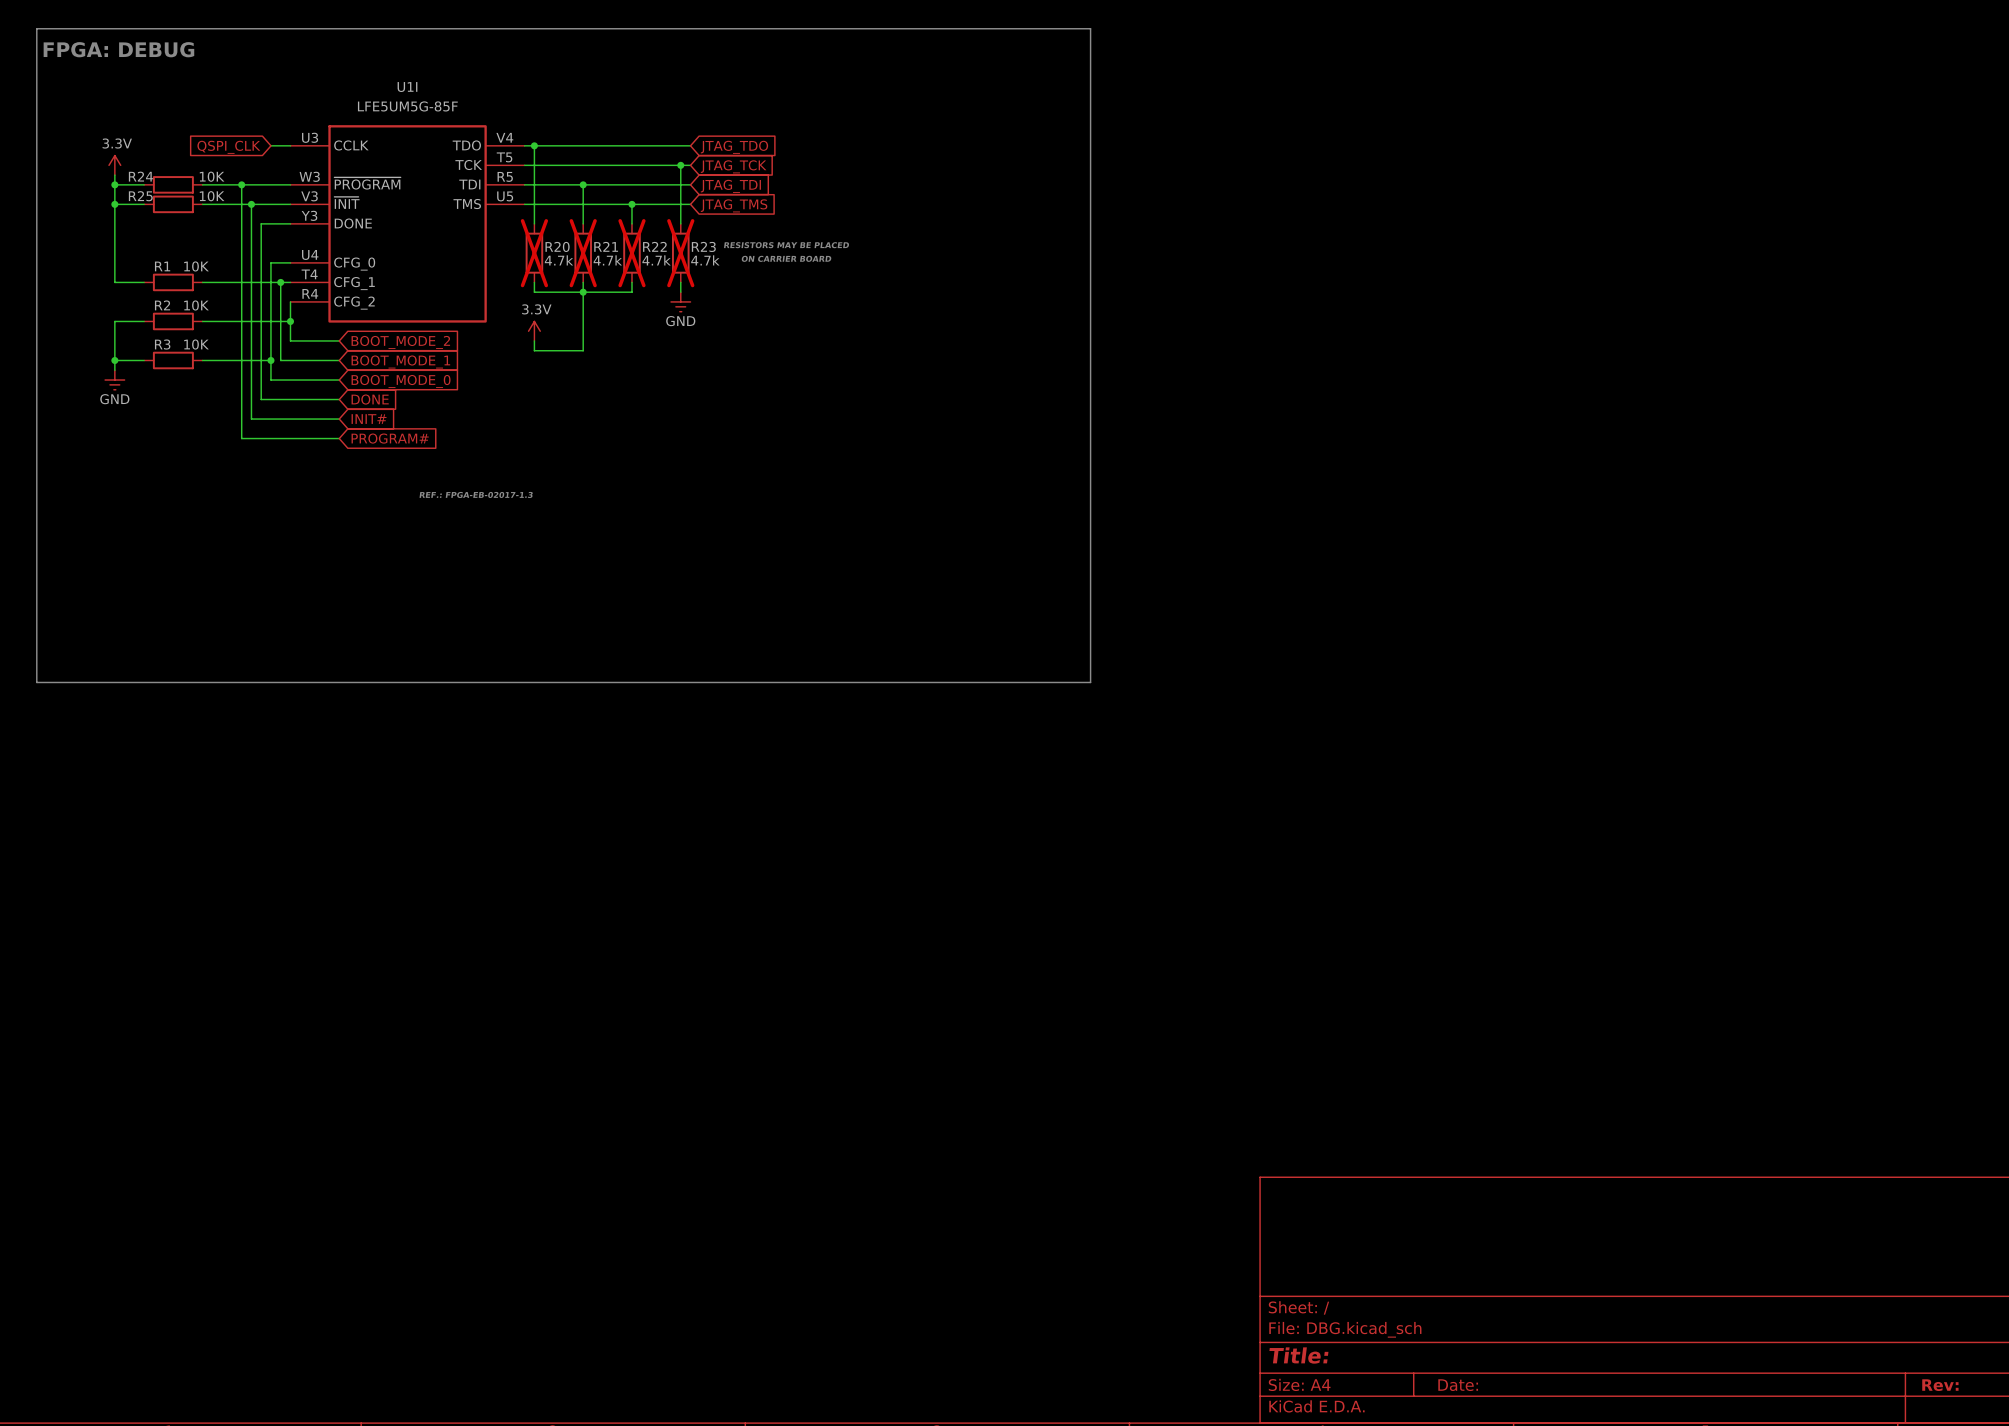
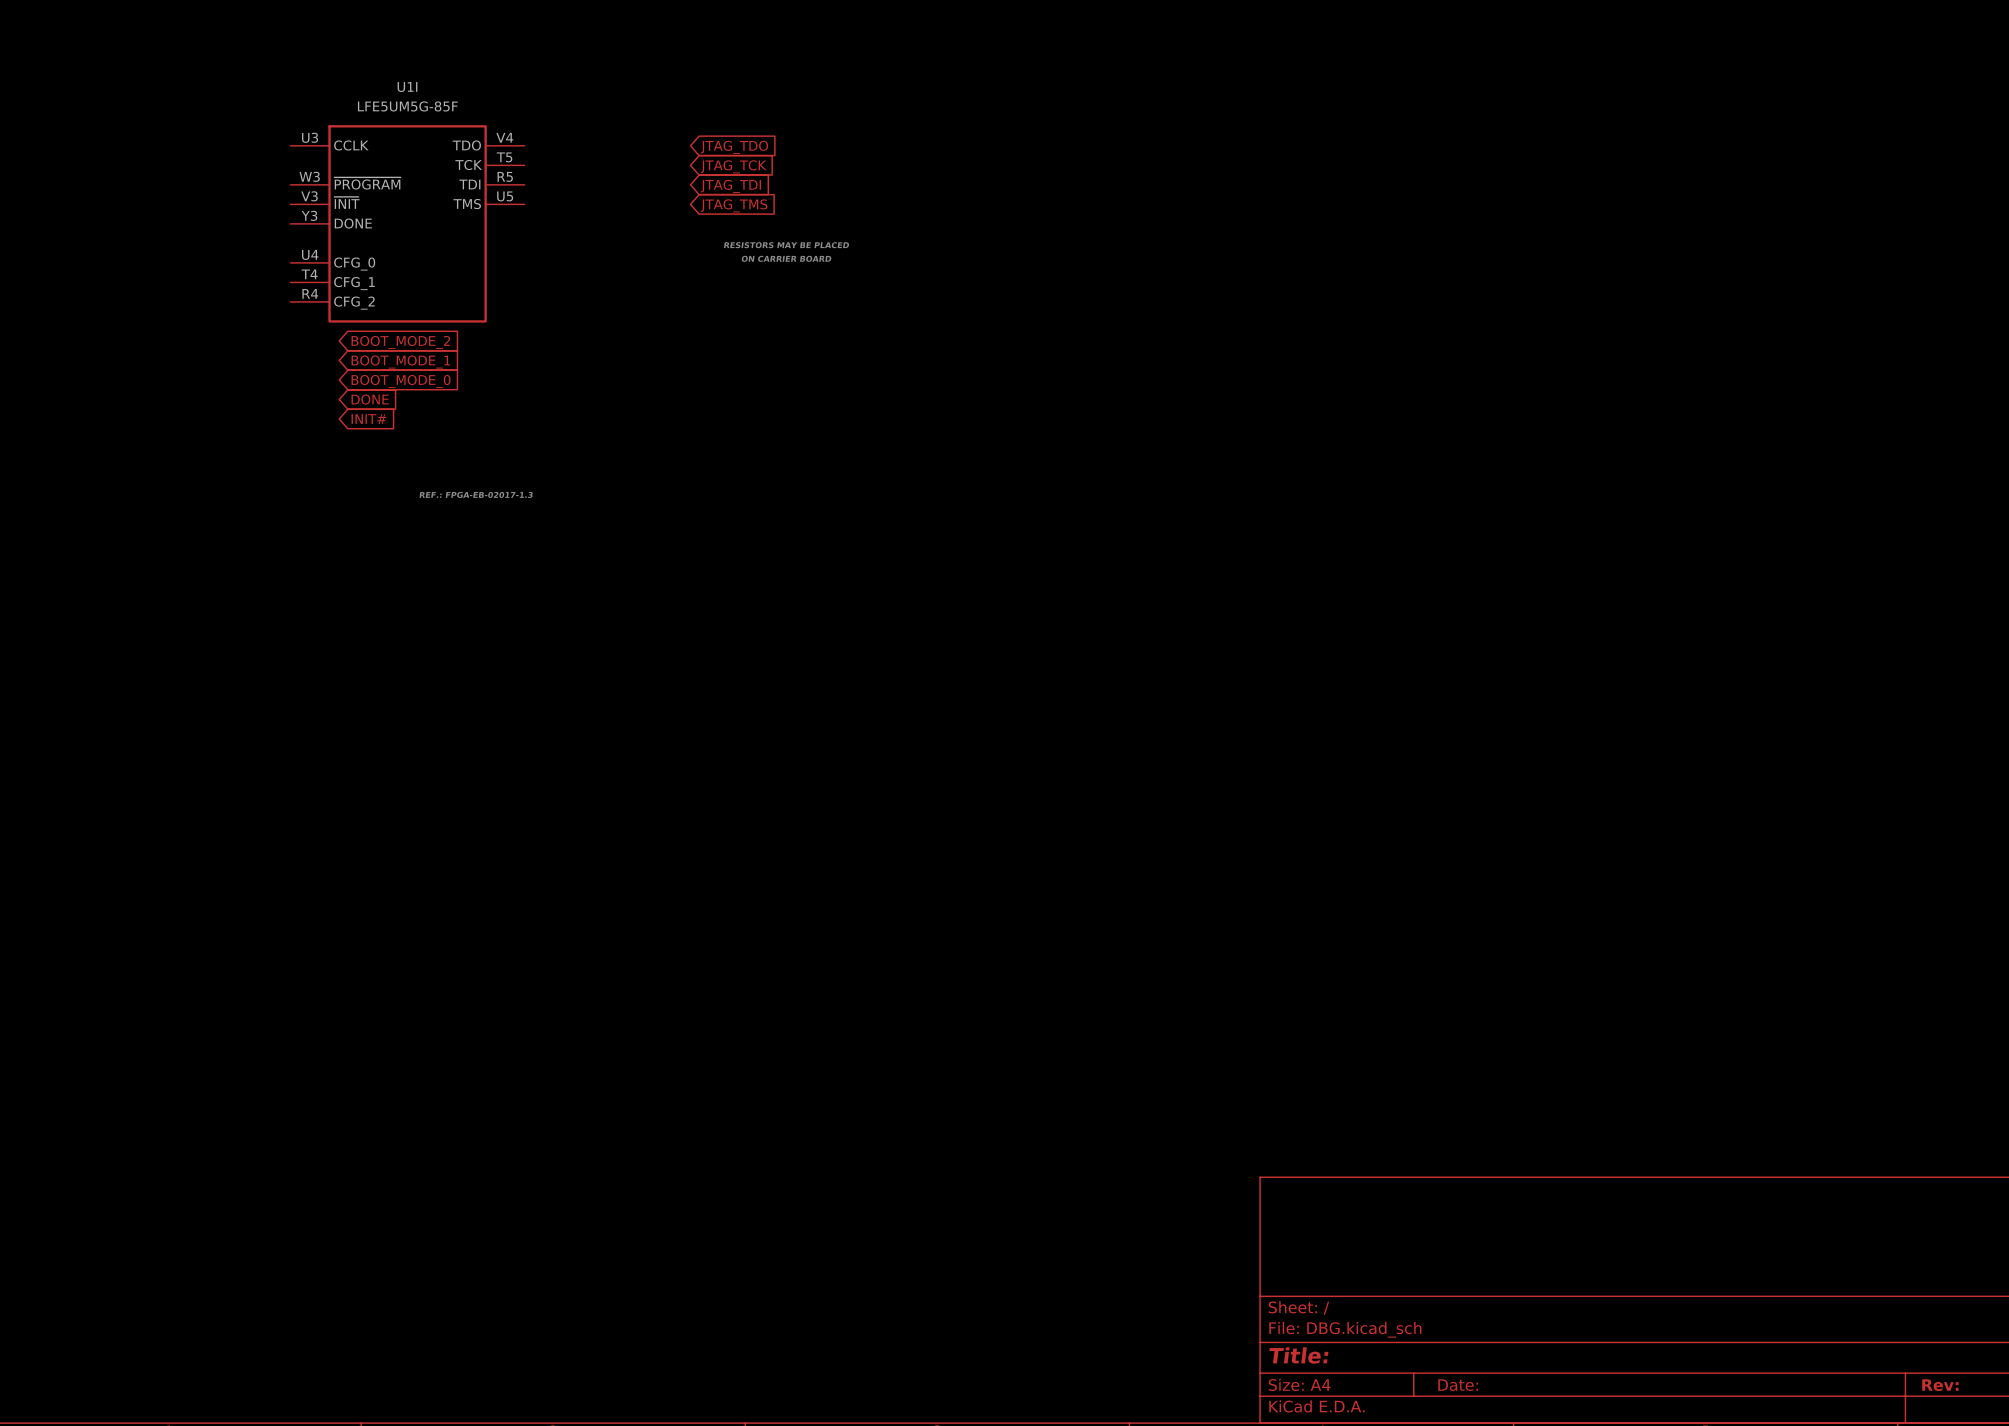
line: (36, 28) (1090, 28) (1090, 682) (36, 682) (36, 28) -> none
text: FPGA: DEBUG (118, 49) -> none
wire: (270, 145) (290, 145) -> none
wire: (524, 145) (690, 145) -> none
wire: (534, 145) (534, 223) -> none
junction: (534, 145) -> none
global label: QSPI_CLK (228, 147) -> none
power symbol: 3.3V (114, 165) -> none
wire: (524, 165) (690, 165) -> none
wire: (680, 165) (680, 223) -> none
junction: (680, 165) -> none
wire: (114, 175) (114, 282) (144, 282) -> none
wire: (114, 184) (144, 184) -> none
junction: (114, 184) -> none
R24: 10K (173, 184) -> none
wire: (202, 184) (290, 184) -> none
wire: (241, 184) (241, 438) (339, 438) -> none
junction: (241, 184) -> none
wire: (524, 184) (690, 184) -> none
wire: (583, 184) (583, 223) -> none
junction: (583, 184) -> none
wire: (114, 204) (144, 204) -> none
junction: (114, 204) -> none
R25: 10K (173, 204) -> none
wire: (202, 204) (290, 204) -> none
wire: (251, 204) (251, 419) (339, 419) -> none
junction: (251, 204) -> none
wire: (524, 204) (690, 204) -> none
wire: (631, 204) (631, 223) -> none
junction: (631, 204) -> none
wire: (290, 223) (261, 223) (261, 399) (339, 399) -> none
R20: 4.7k (534, 253) -> none
R21: 4.7k (583, 253) -> none
R22: 4.7k (631, 253) -> none
R23: 4.7k (680, 253) -> none
wire: (290, 262) (270, 262) (270, 380) (339, 380) -> none
R1: 10K (173, 282) -> none
wire: (202, 282) (290, 282) -> none
wire: (280, 282) (280, 360) (339, 360) -> none
junction: (280, 282) -> none
wire: (534, 282) (534, 292) (631, 292) (631, 282) -> none
wire: (583, 282) (583, 350) (534, 350) (534, 340) -> none
wire: (680, 282) (680, 292) -> none
junction: (583, 292) -> none
wire: (290, 301) (290, 340) (339, 340) -> none
power symbol: GND (680, 301) -> none
wire: (144, 321) (114, 321) (114, 370) -> none
R2: 10K (173, 321) -> none
wire: (202, 321) (290, 321) -> none
junction: (290, 321) -> none
power symbol: 3.3V (534, 331) -> none
wire: (114, 360) (144, 360) -> none
junction: (114, 360) -> none
R3: 10K (173, 360) -> none
wire: (202, 360) (270, 360) -> none
junction: (270, 360) -> none
power symbol: GND (114, 380) -> none
global label: PROGRAM# (390, 438) -> none

